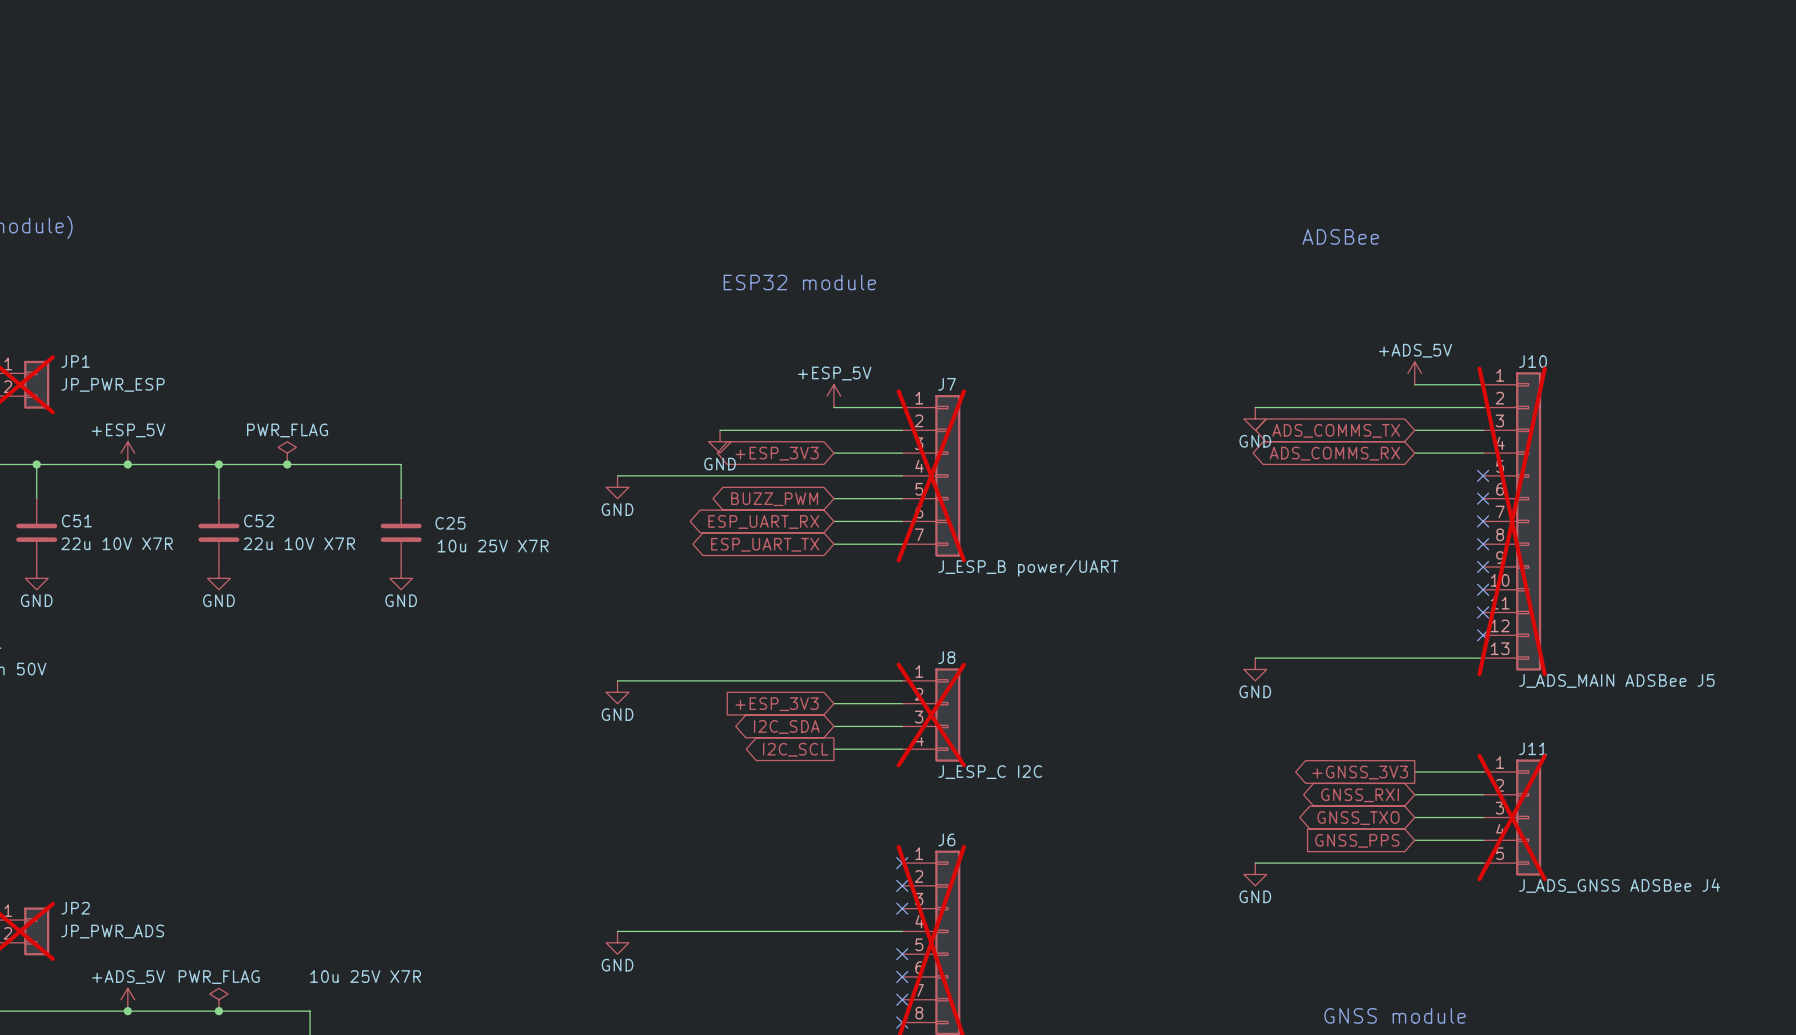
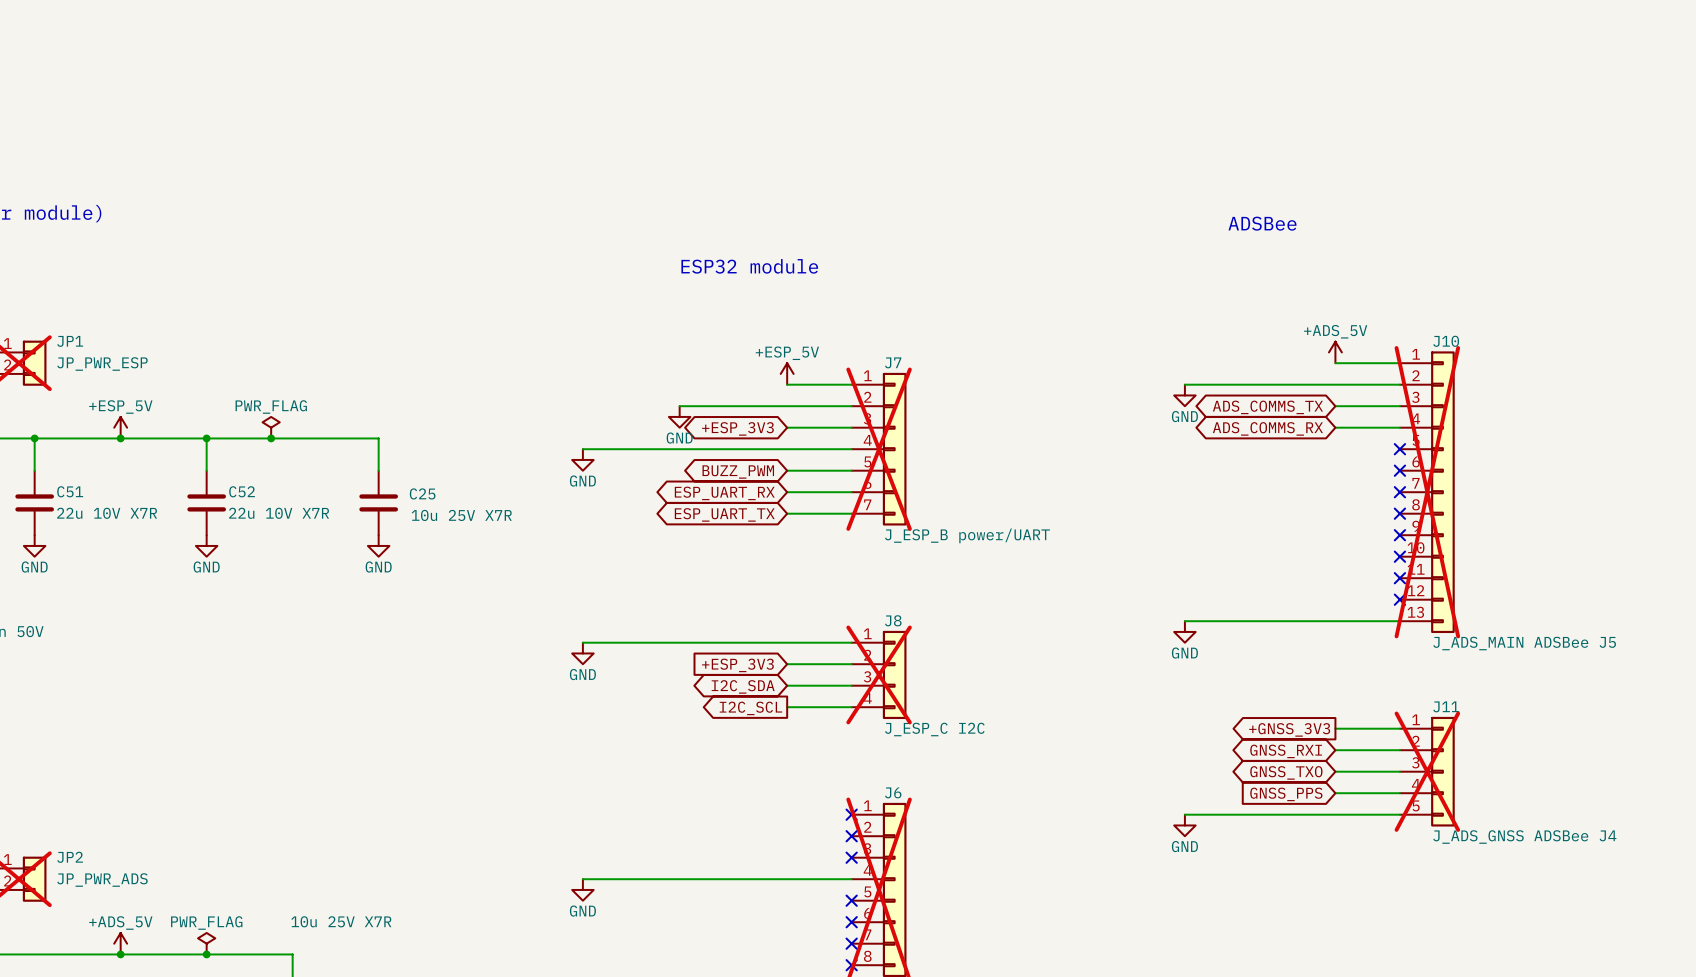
text: GNSS module (1395, 1015) -> none

